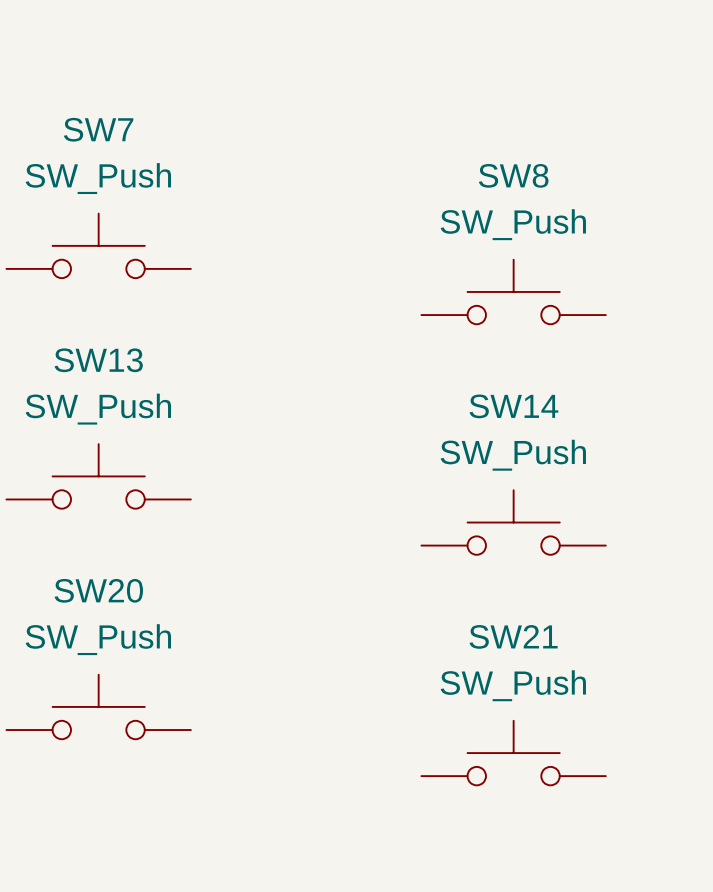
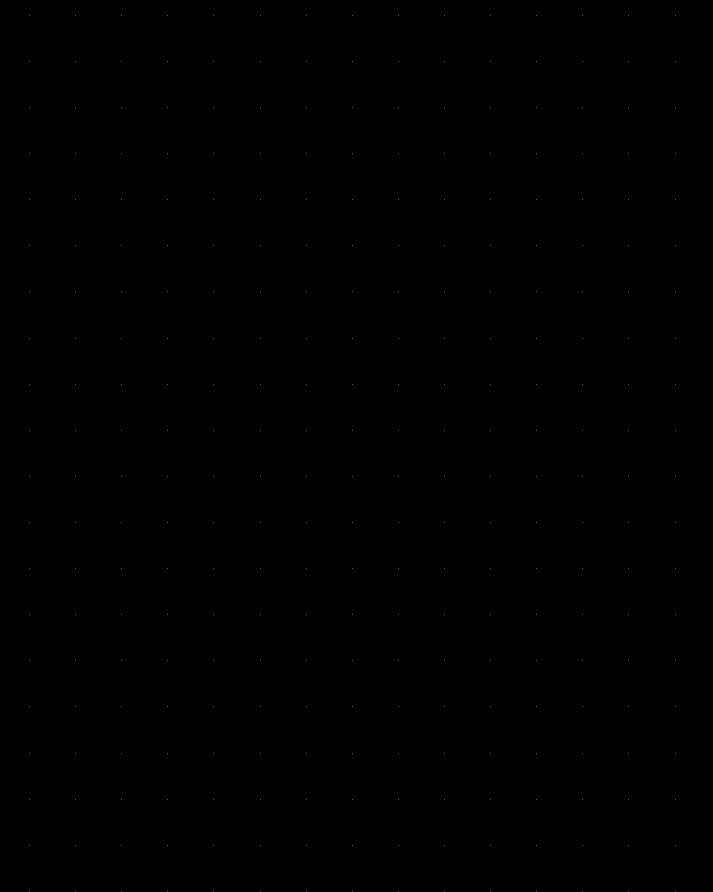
SW7: SW_Push (98, 245) -> none
SW8: SW_Push (513, 291) -> none
SW13: SW_Push (98, 476) -> none
SW14: SW_Push (513, 522) -> none
SW20: SW_Push (98, 706) -> none
SW21: SW_Push (513, 753) -> none

